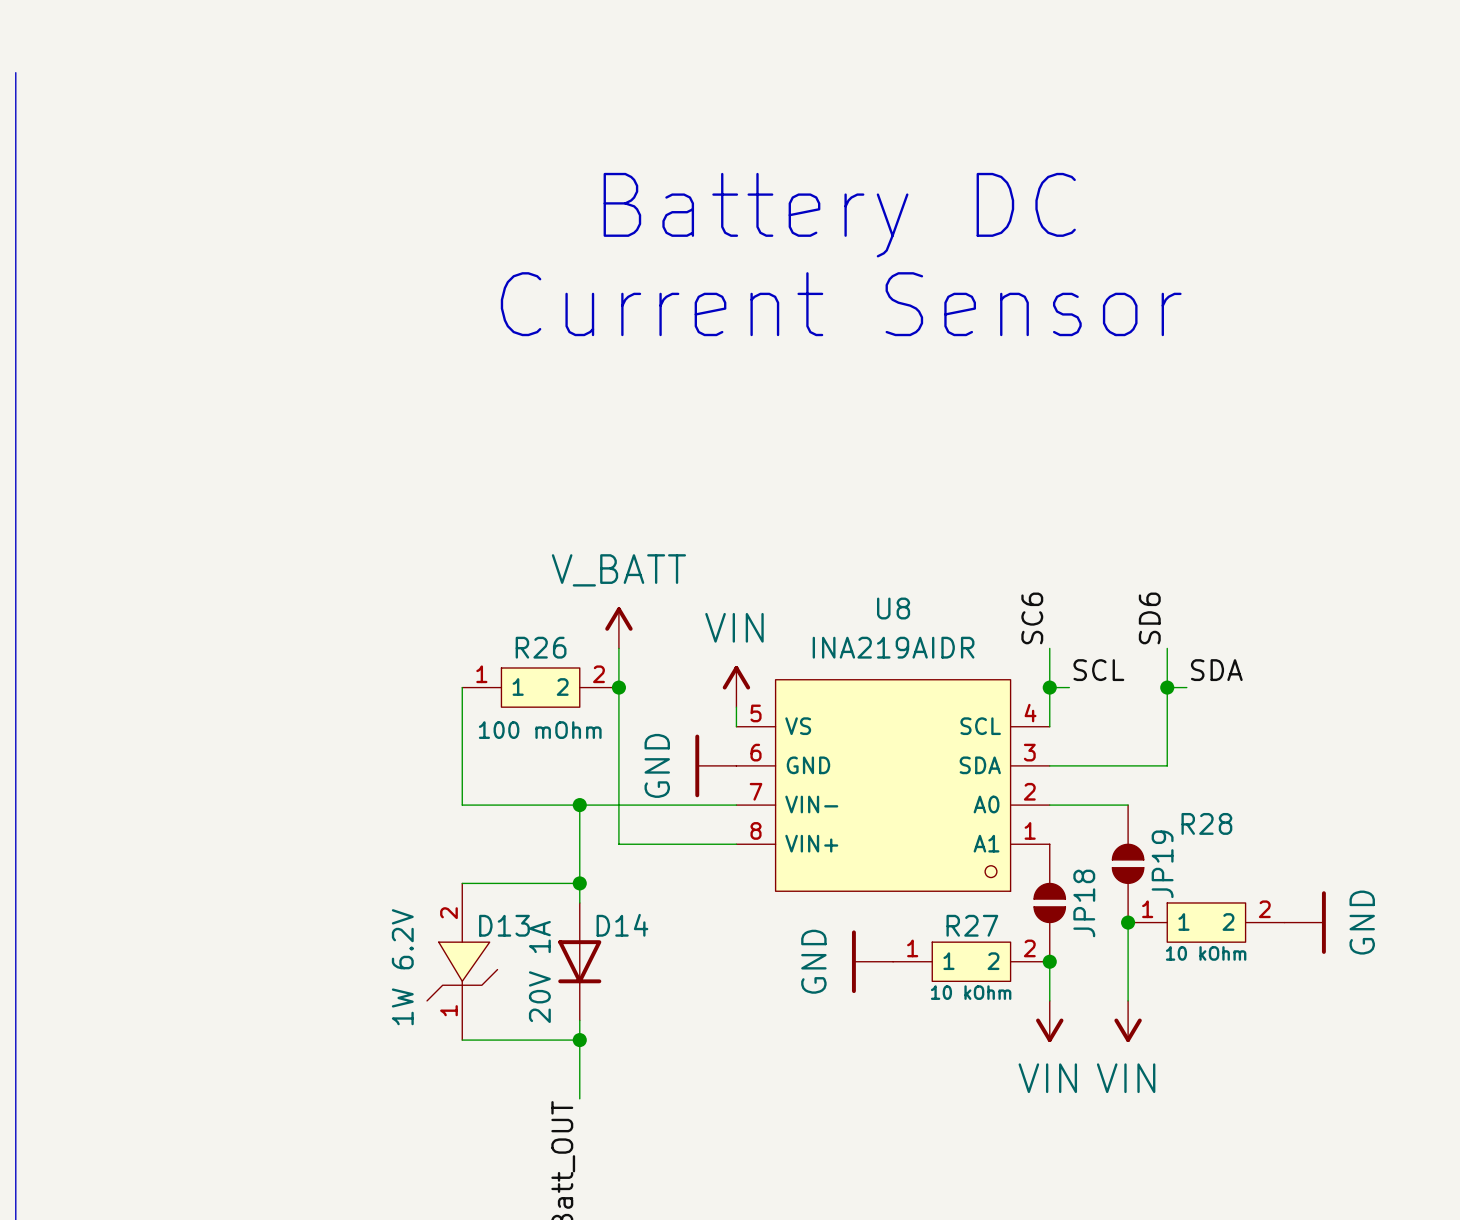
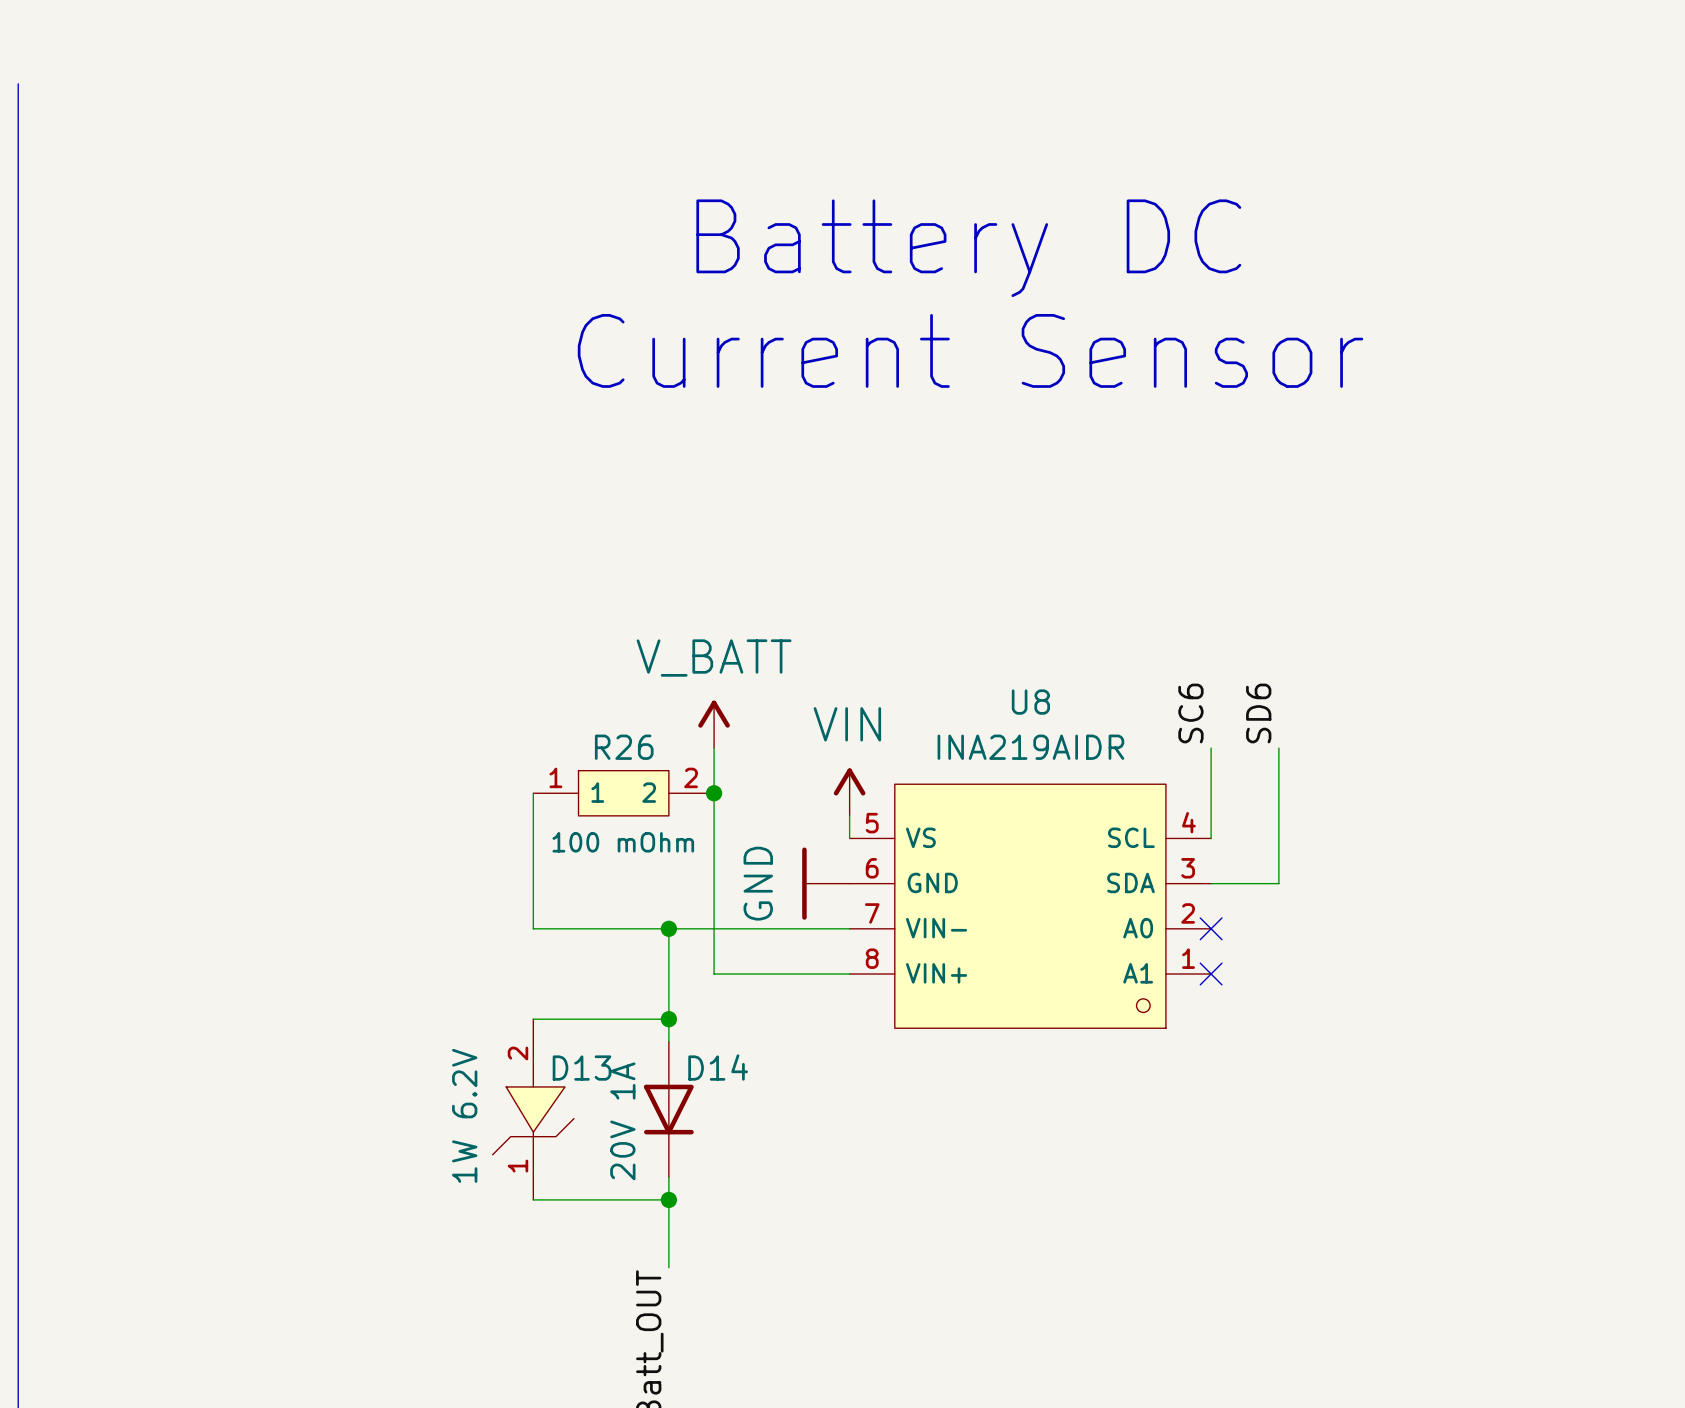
label position: SD6 (1149, 618) -> SD6 (1258, 713)
wire: (1167, 648) (1167, 765) (1108, 765) -> (1278, 748) (1278, 883)
label: SCL (1098, 670) -> none
label: SDA (1216, 670) -> none
wire: (1049, 687) (1069, 687) -> none
junction: (1049, 687) -> none
wire: (1167, 687) (1186, 687) -> none
junction: (1167, 687) -> none
wire: (1049, 805) (1128, 805) -> none
no-connect mark: none -> (1211, 928)
no-connect mark: none -> (1211, 974)
JP19: (1128, 863) -> none
JP18: (1049, 902) -> none
wire: (1128, 922) (1128, 1000) -> none
junction: (1128, 922) -> none
R28: 10 kOhm (1206, 922) -> none
power symbol: GND (1305, 922) -> none
power symbol: GND (872, 961) -> none
R27: 10 kOhm (971, 961) -> none
wire: (1049, 961) (1049, 1000) -> none
junction: (1049, 961) -> none
power symbol: VIN (1049, 1021) -> none
power symbol: VIN (1128, 1021) -> none

